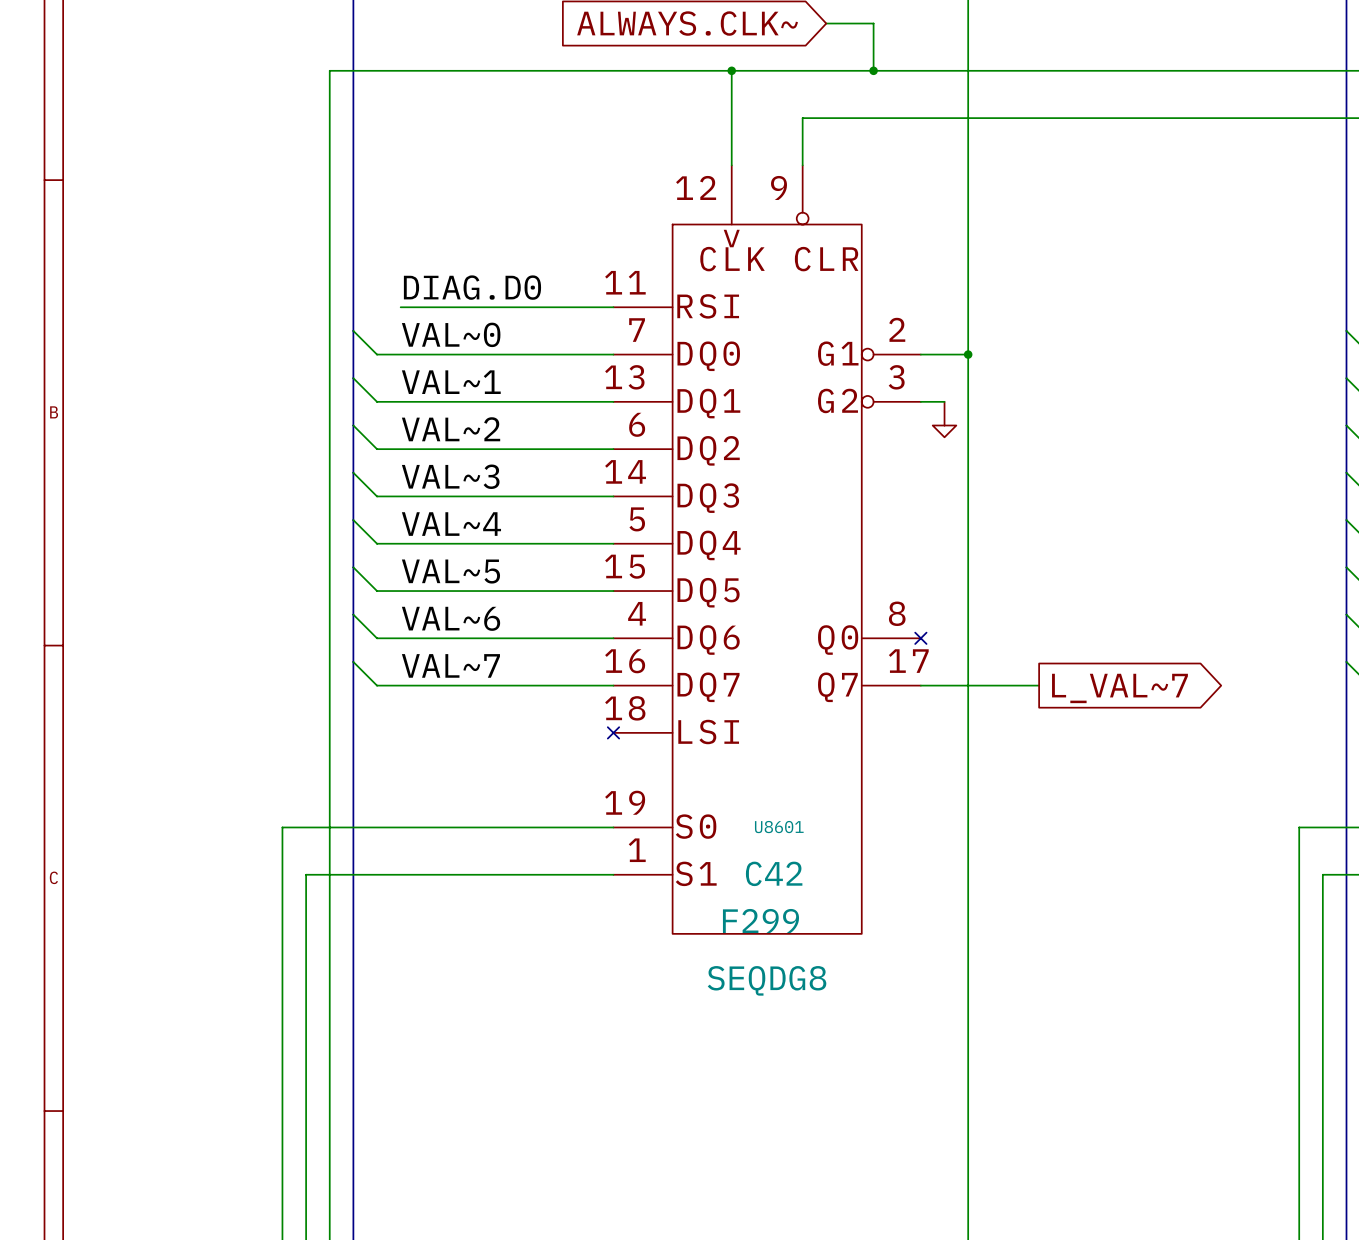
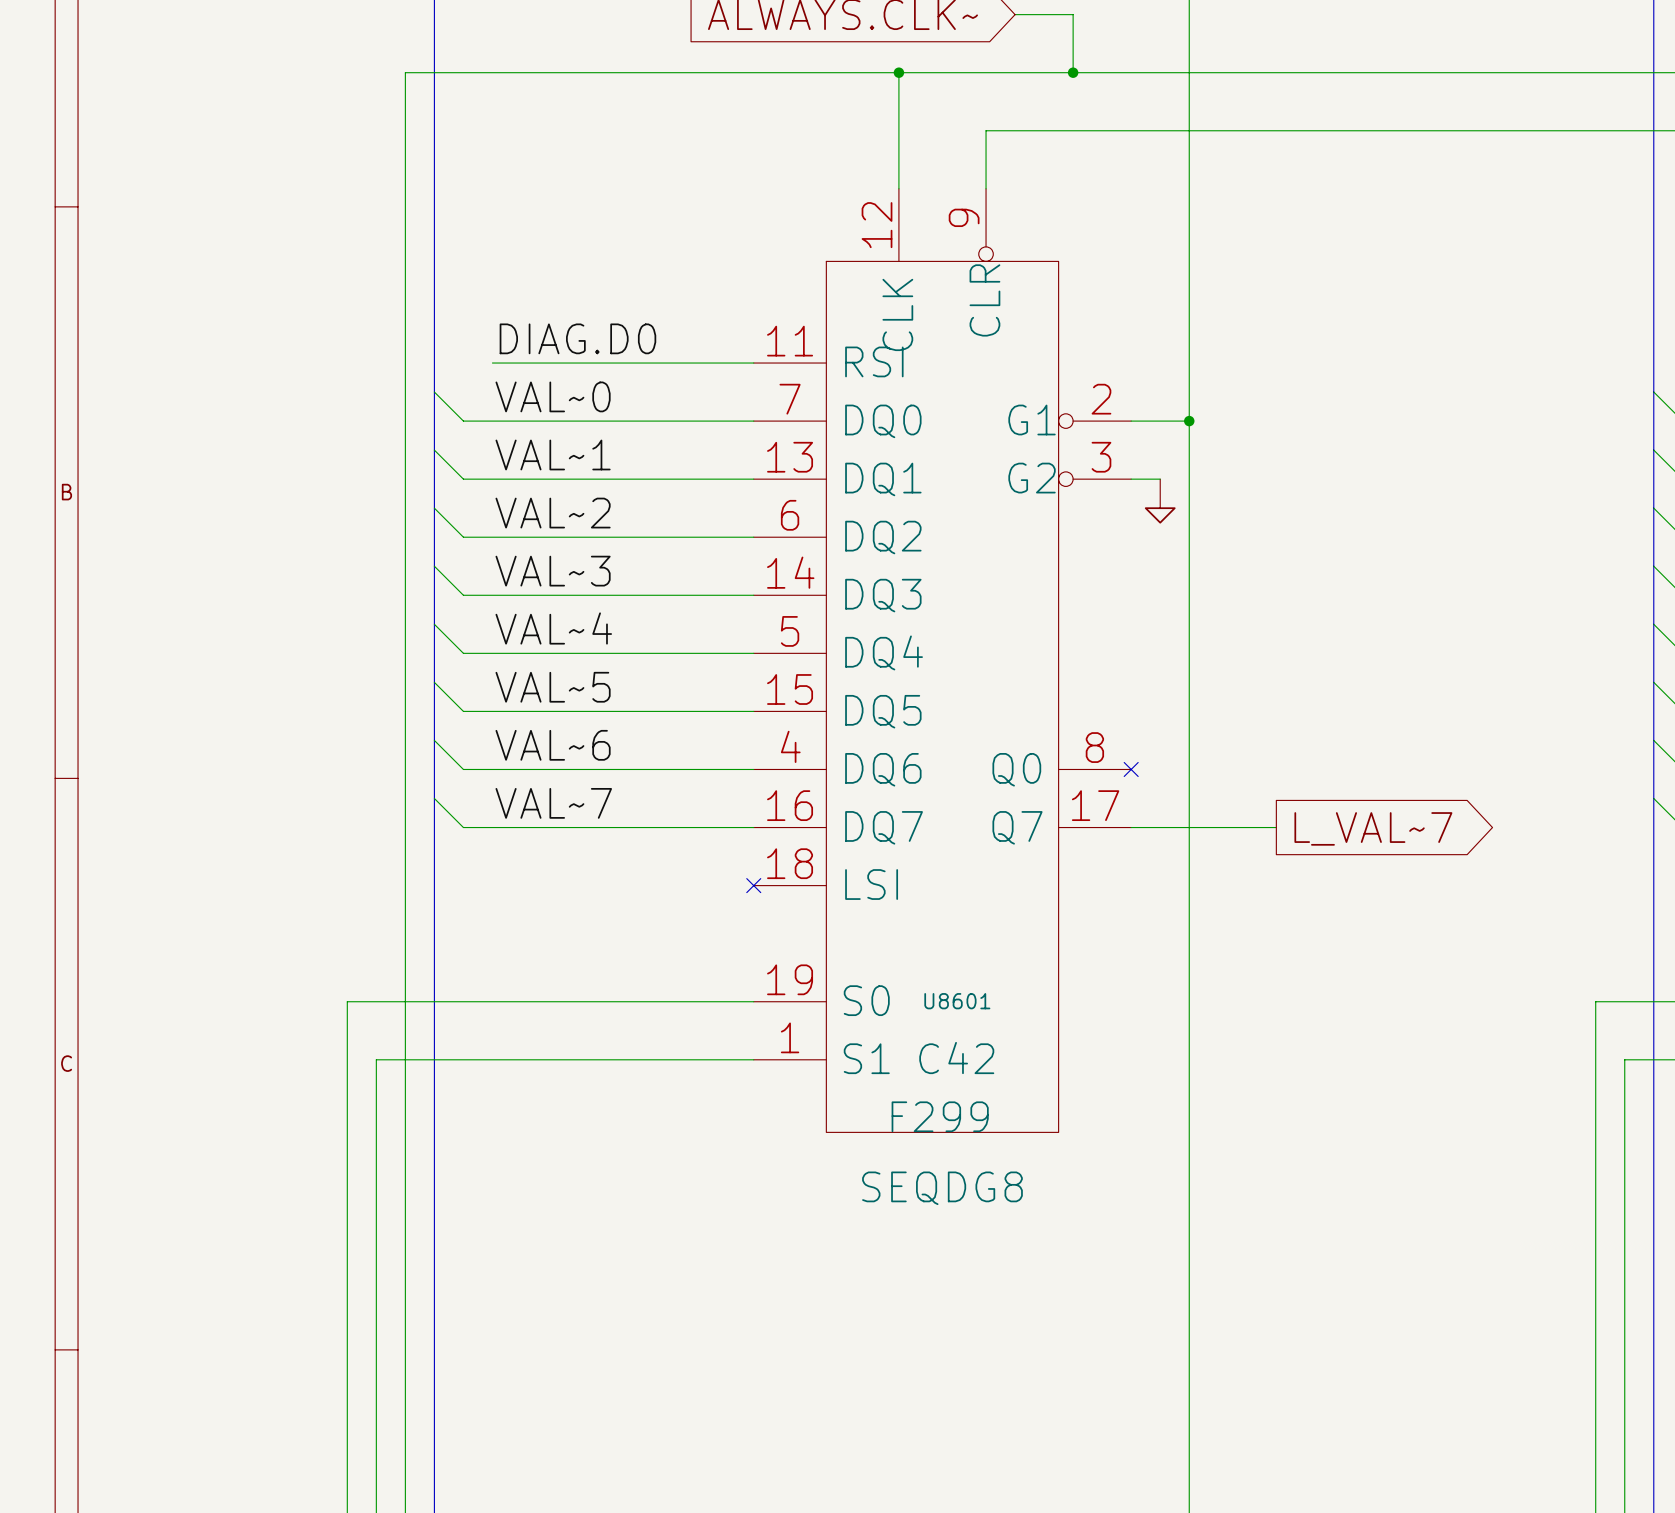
U8601 symbol: [613, 165, 921, 934] -> [753, 188, 1132, 1133]

